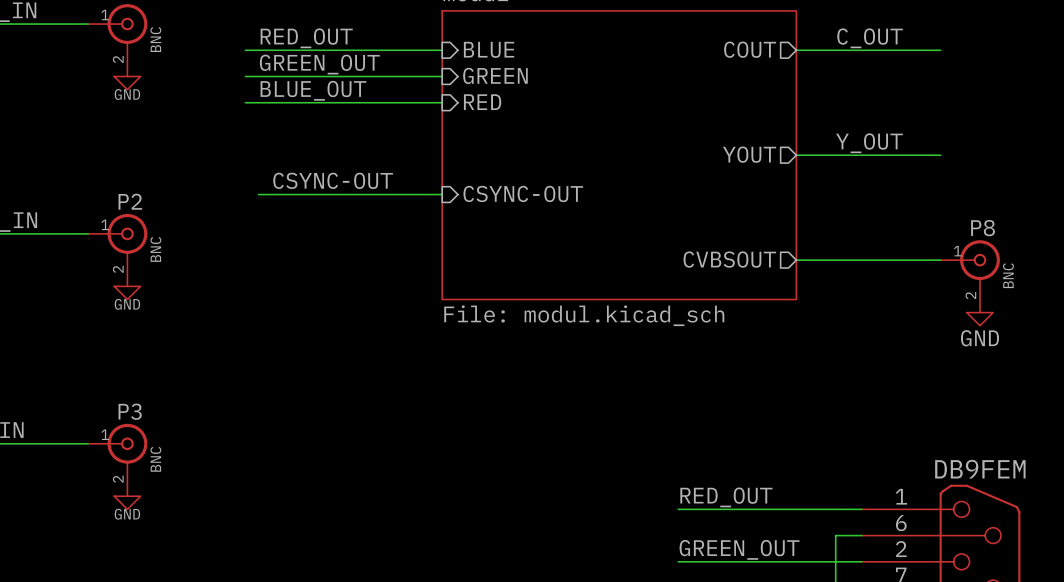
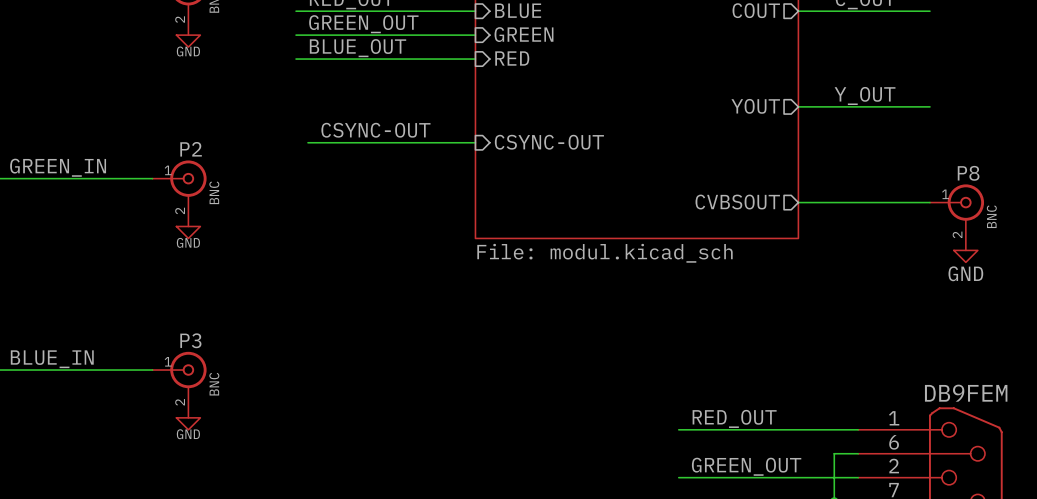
wire: none -> (678, 429) (690, 429)
wire: none -> (678, 477) (690, 477)

